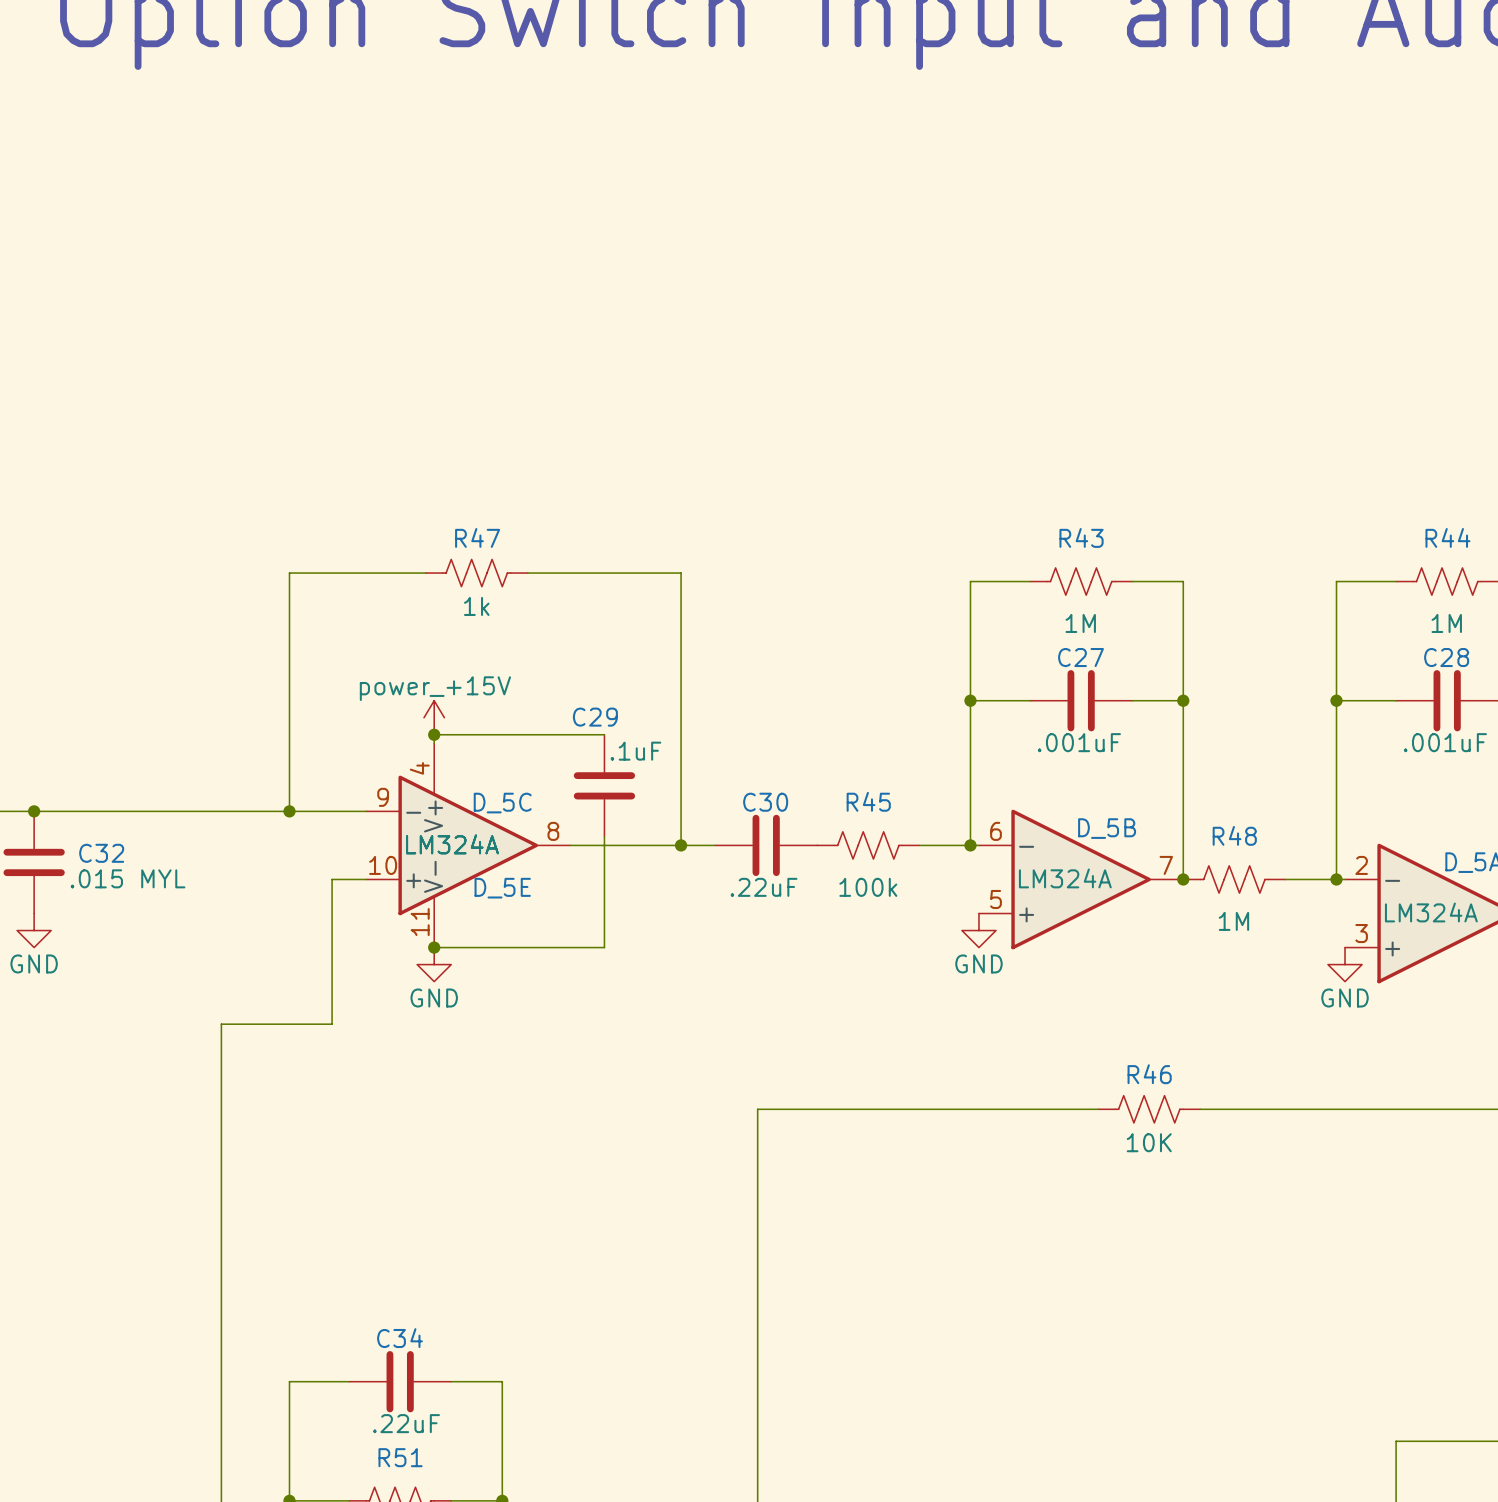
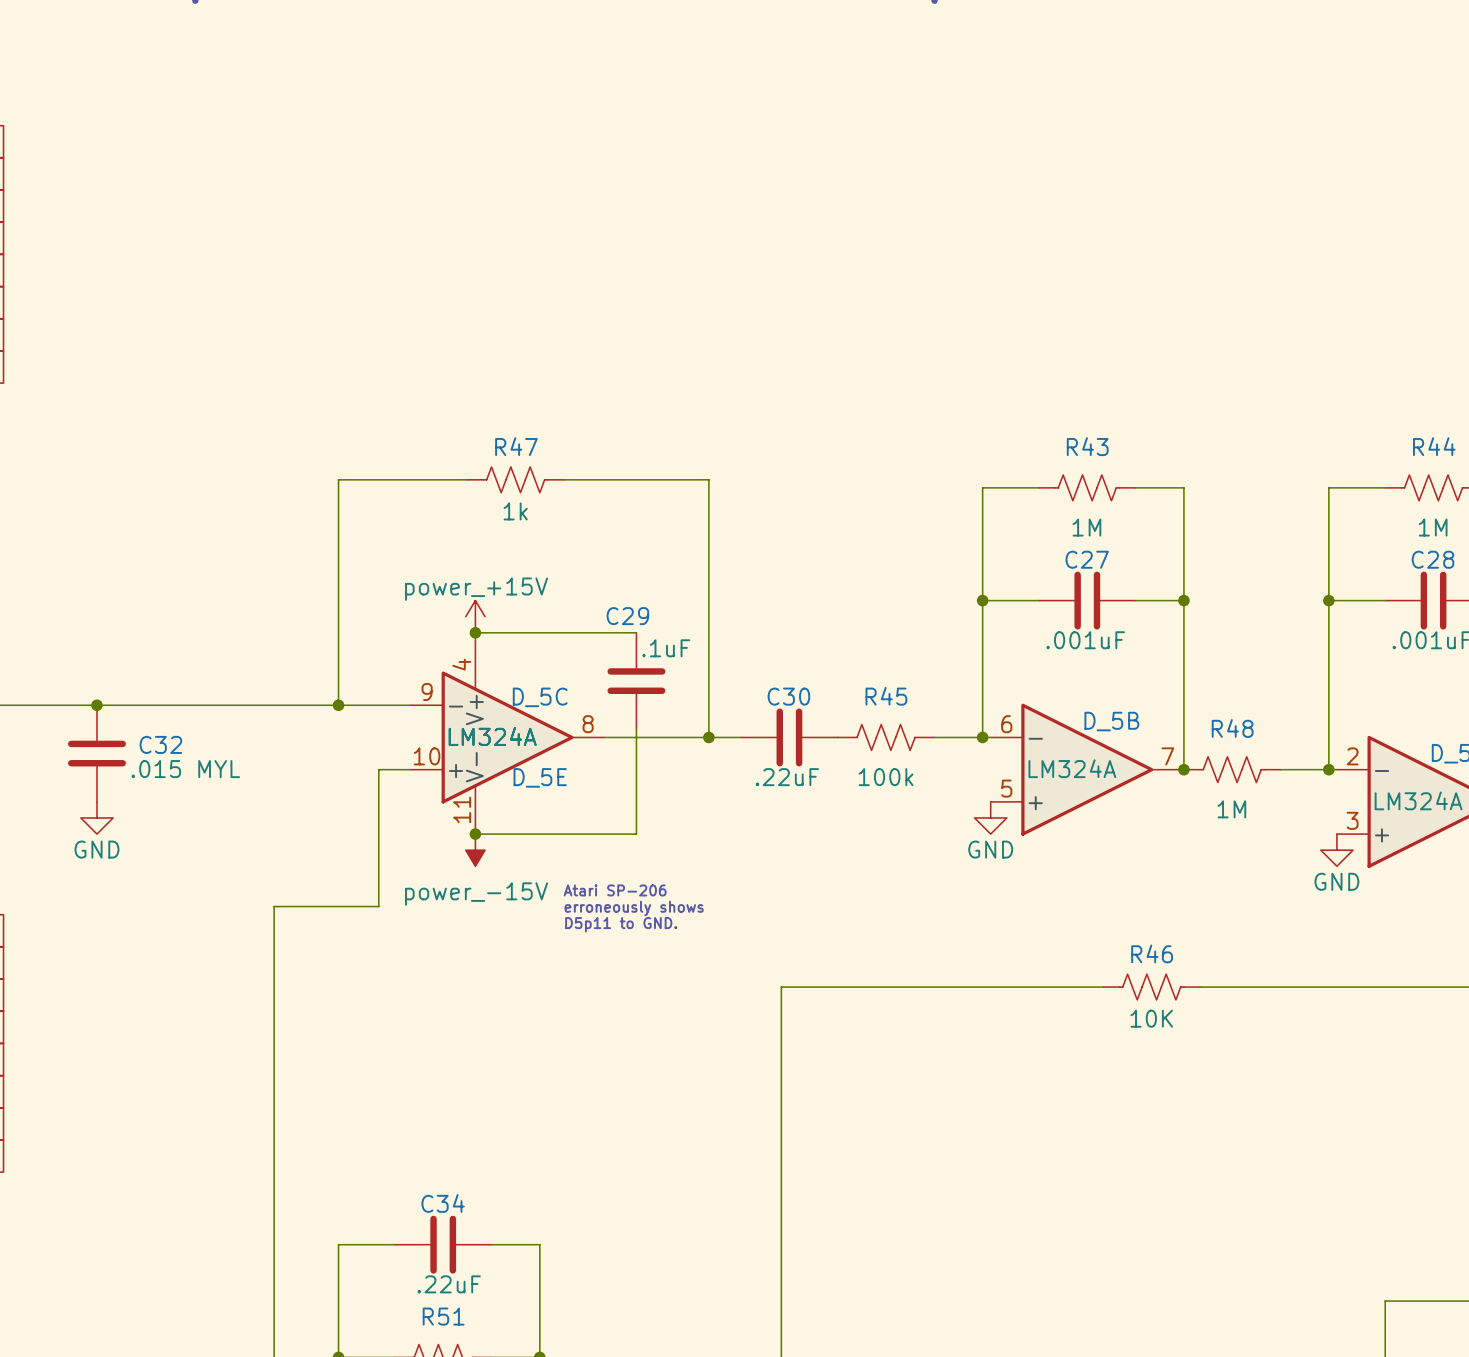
power symbol: GND (434, 964) -> power_-15V (475, 850)
text: none -> Atari SP-206 (615, 890)
text: none -> erroneously shows (634, 908)
text: none -> D5p11 to GND. (621, 924)

